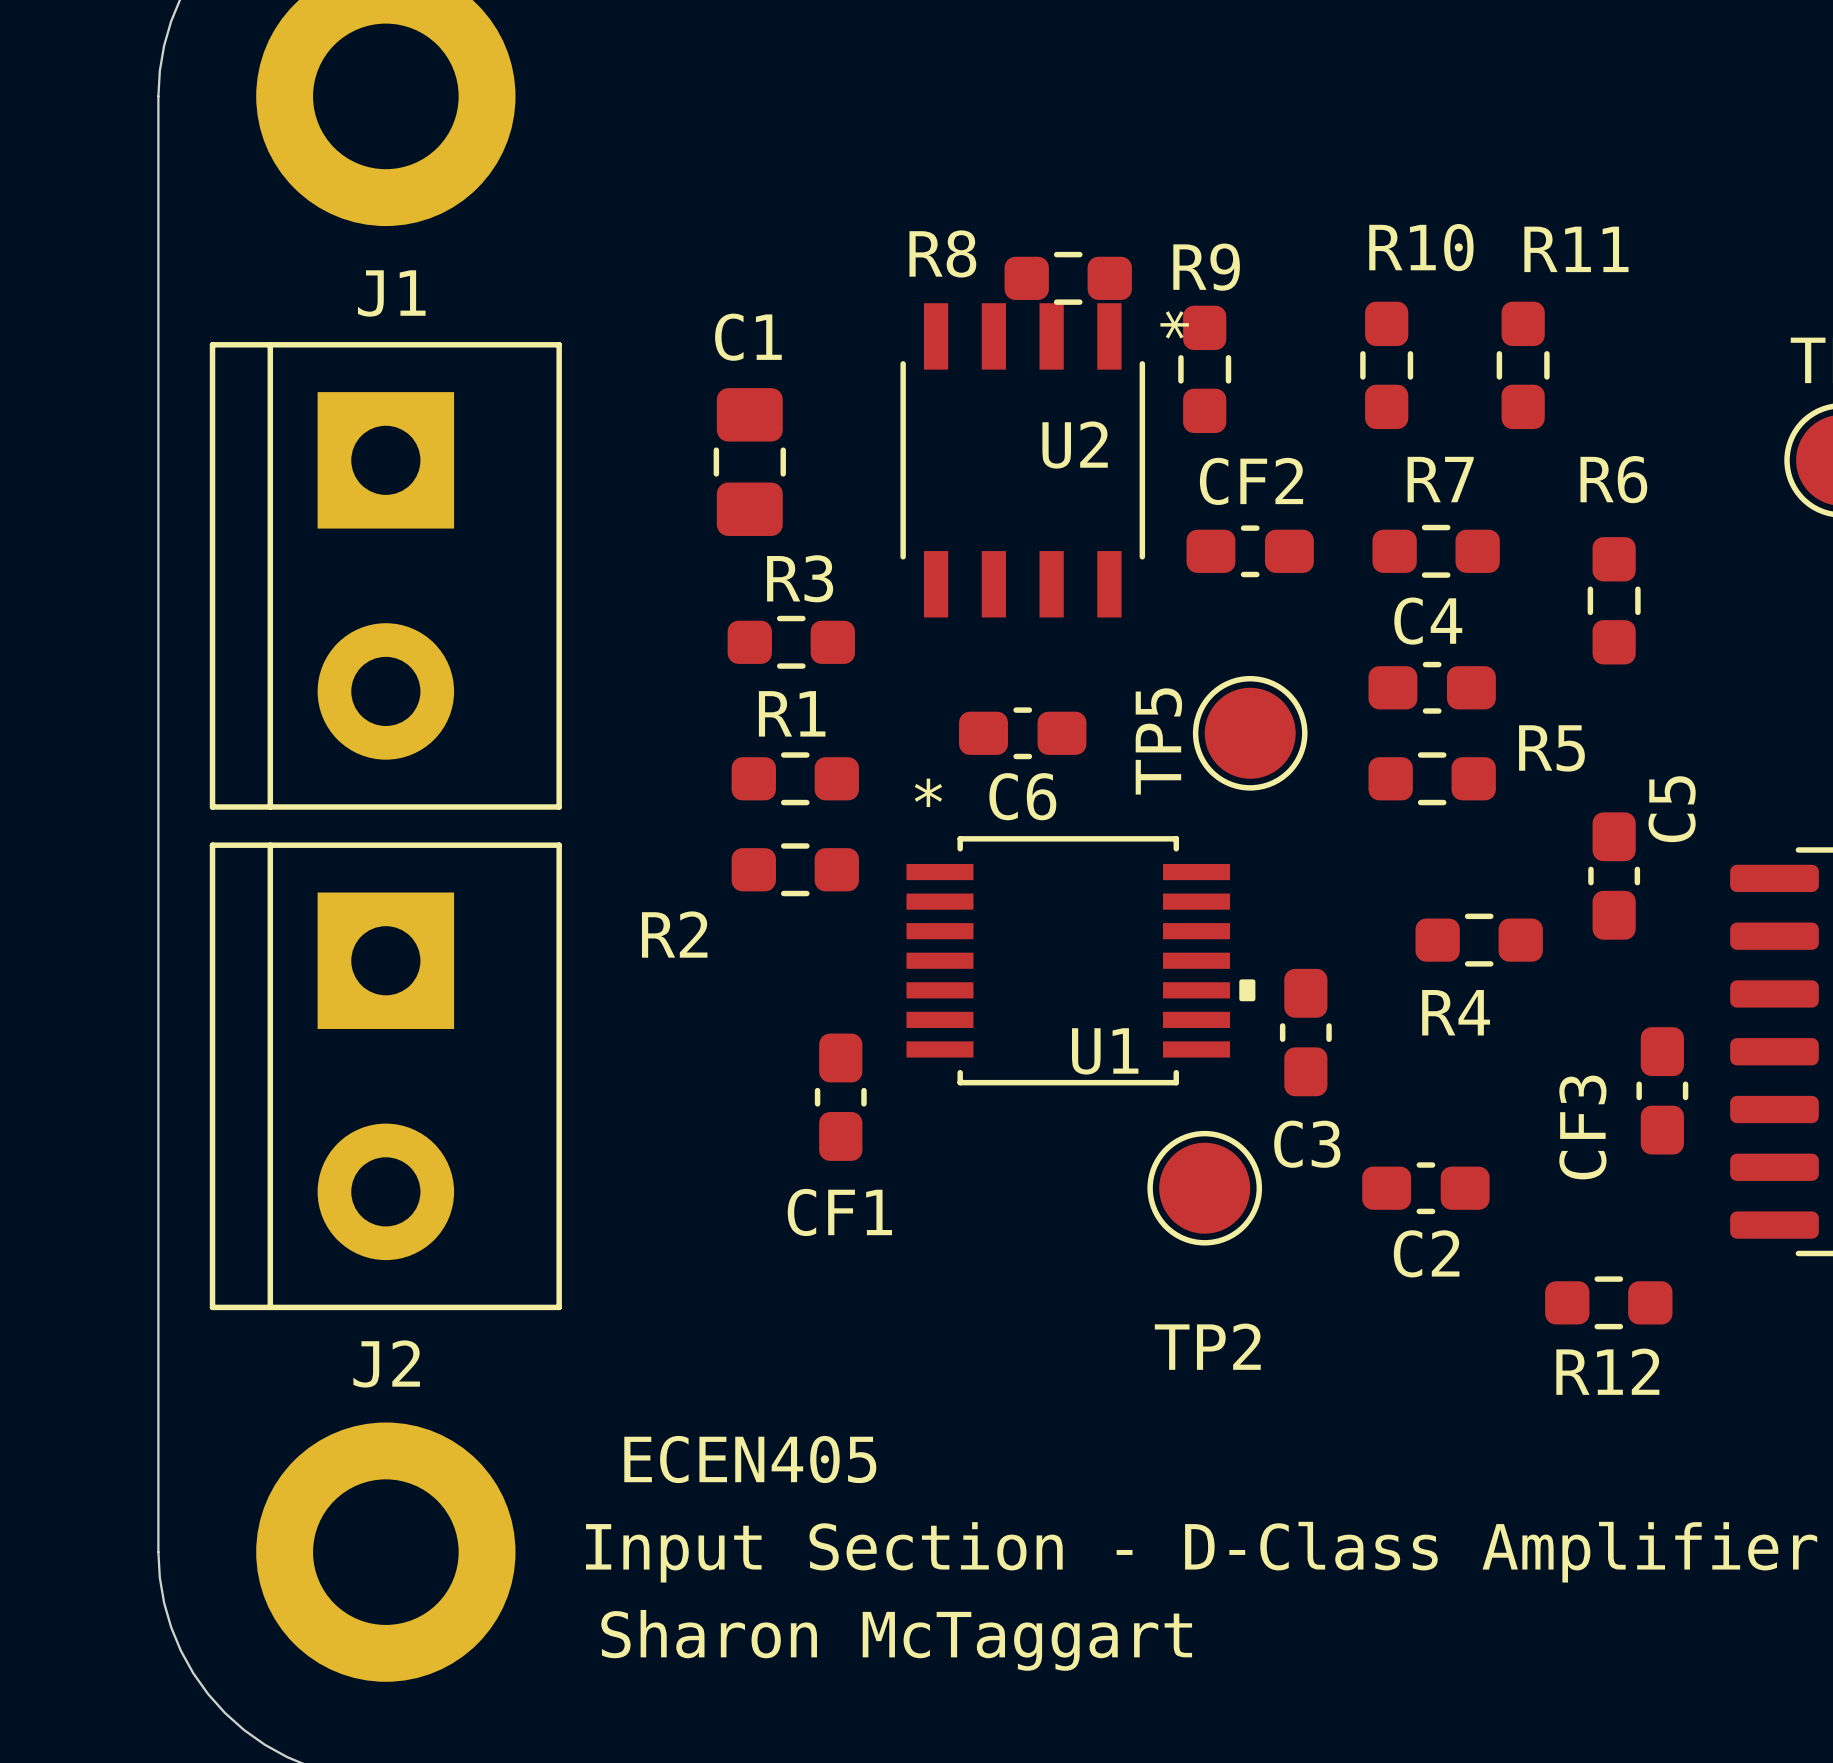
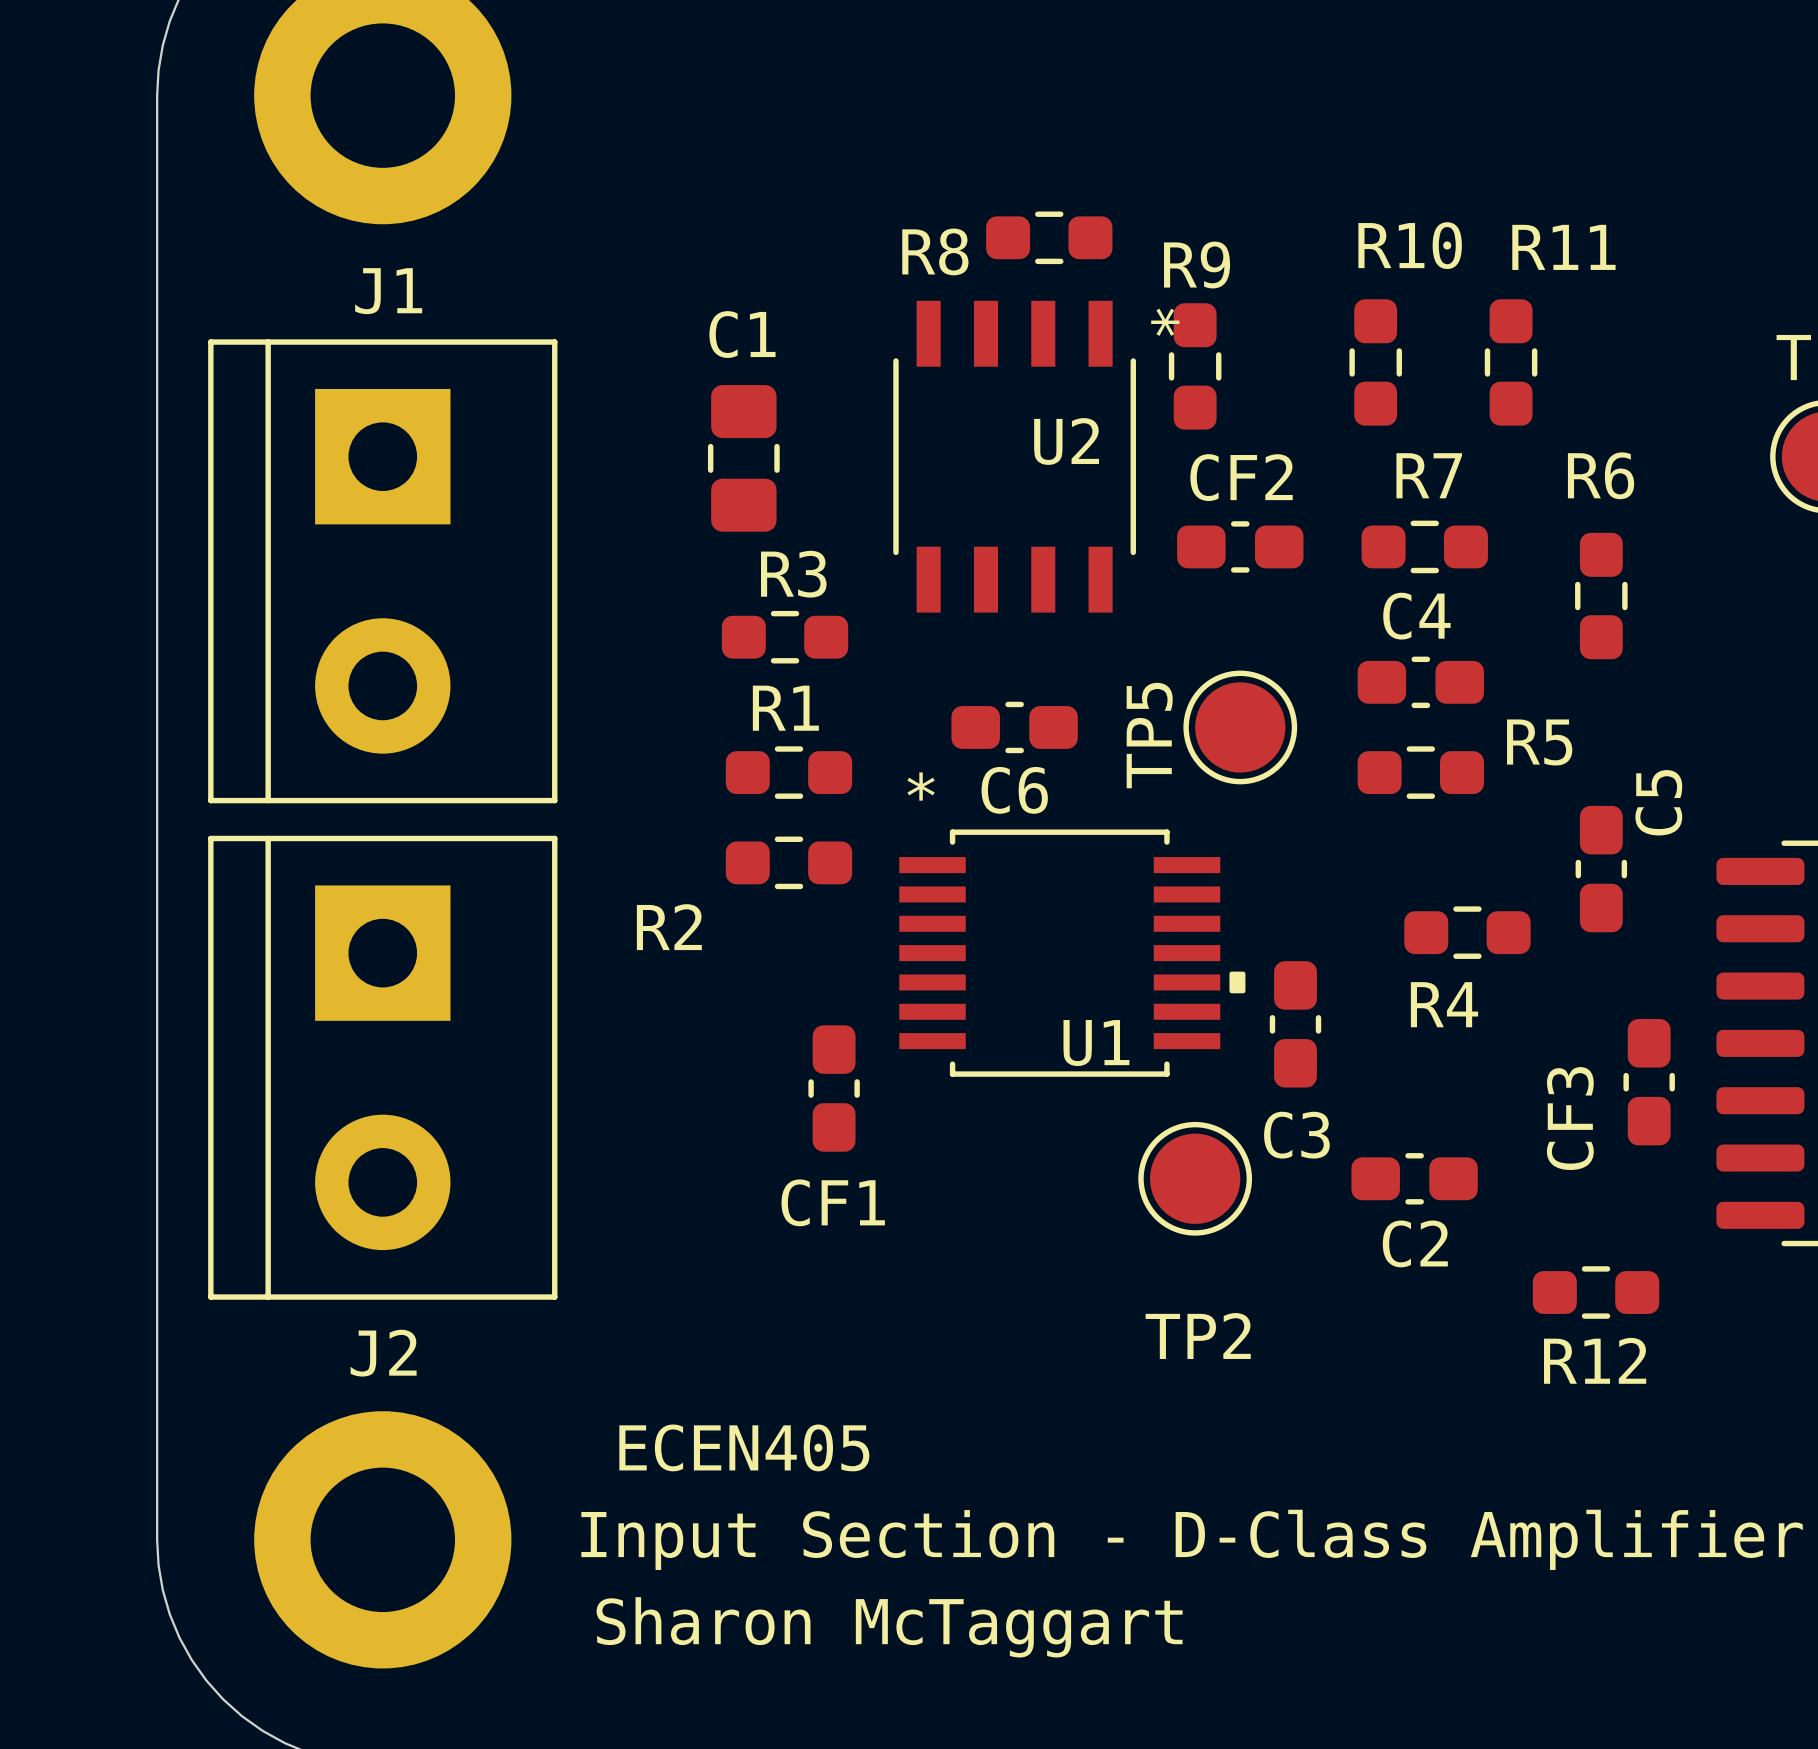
R8 position: (1068, 278) -> (1049, 237)

